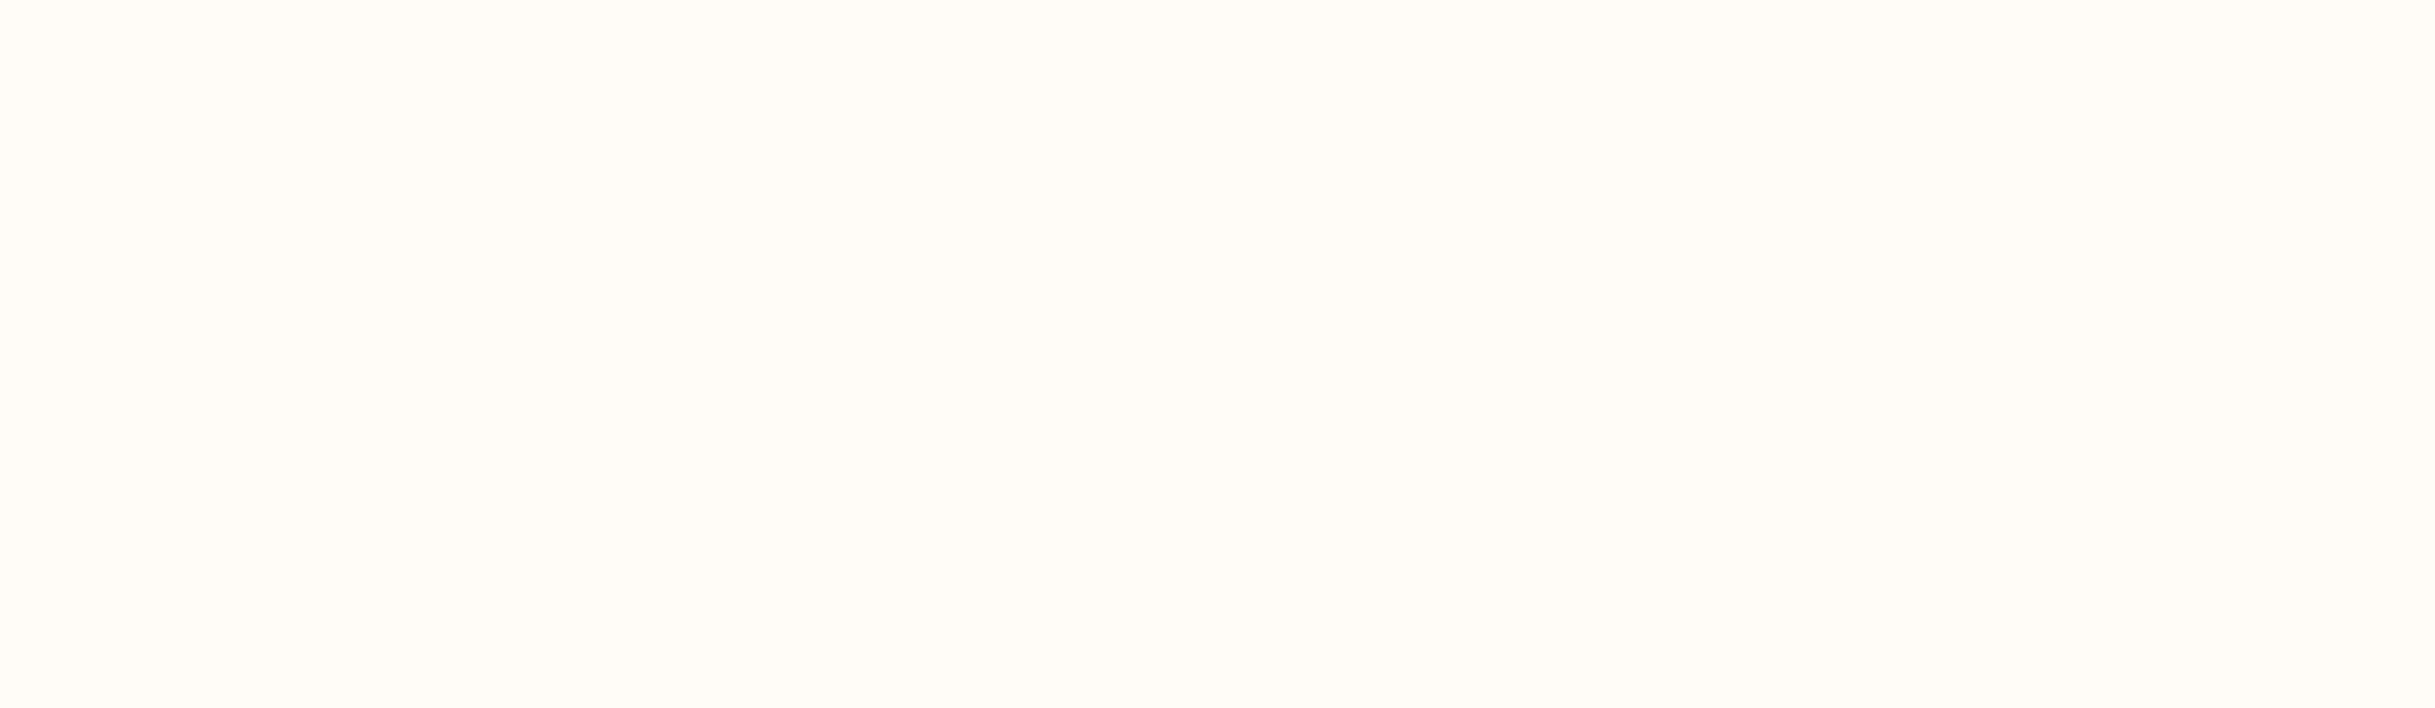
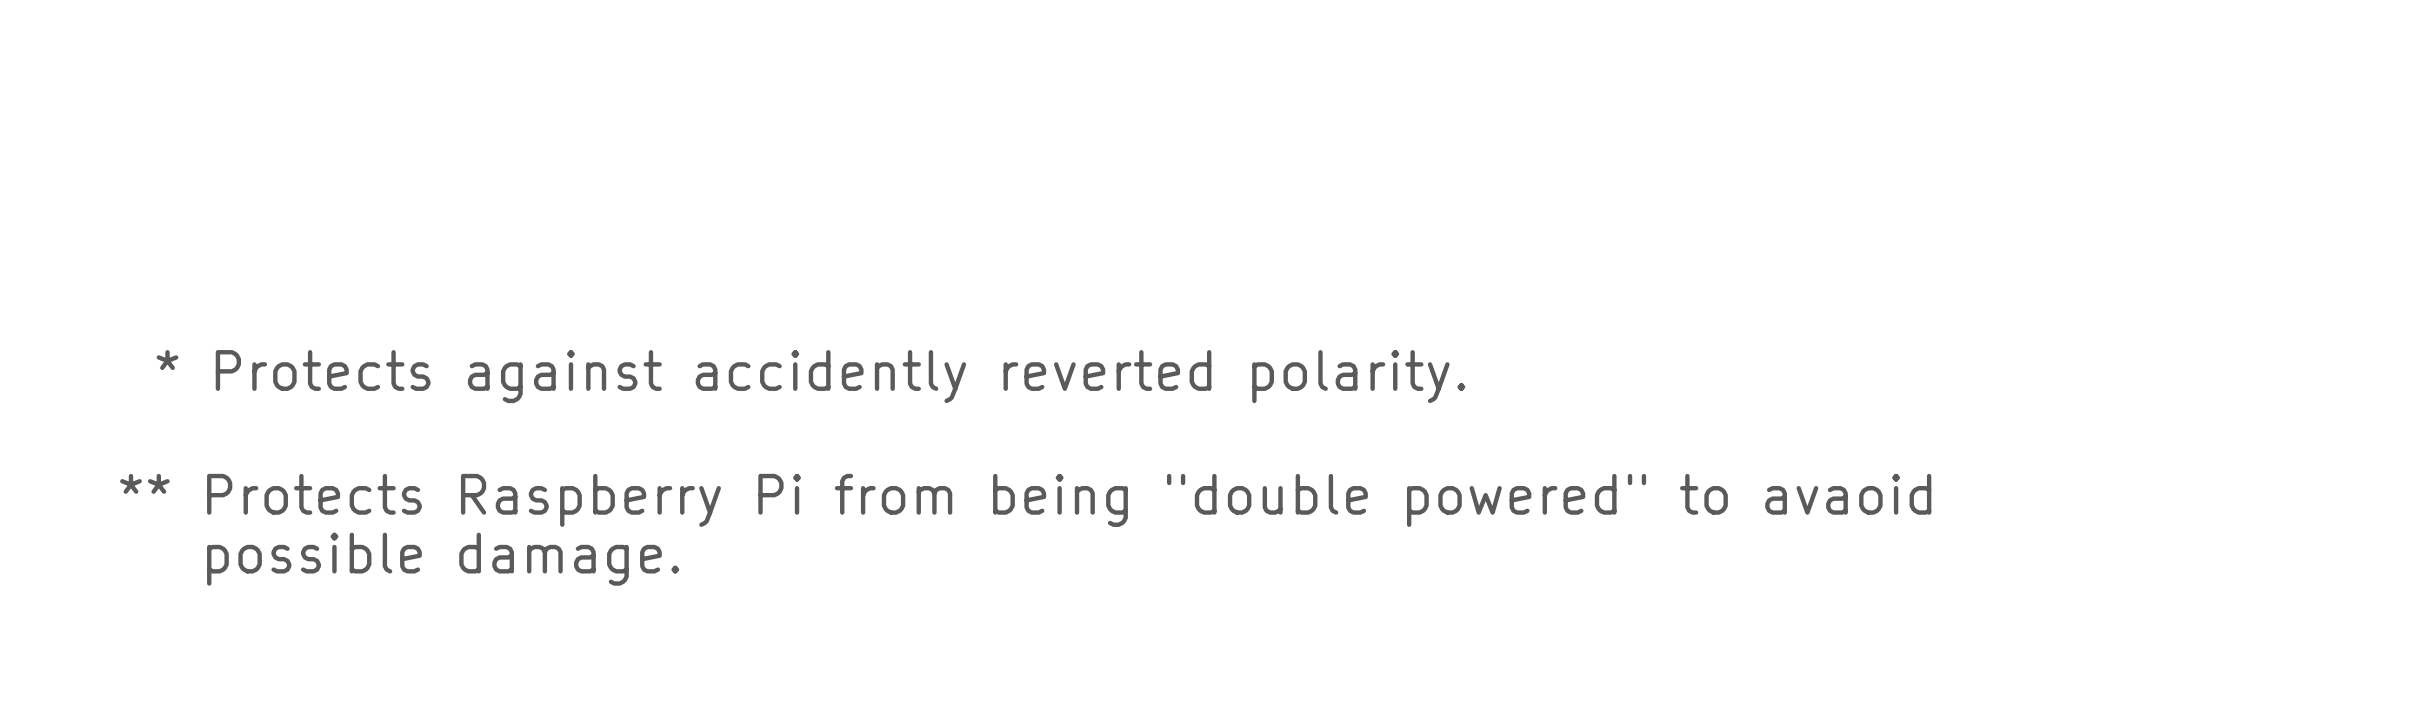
text: none -> * Protects against accidently reverted polarity. (810, 376)
text: none -> ** Protects Raspberry Pi from being "double powered" to avaoid (1025, 500)
text: none -> possible damage. (443, 559)

